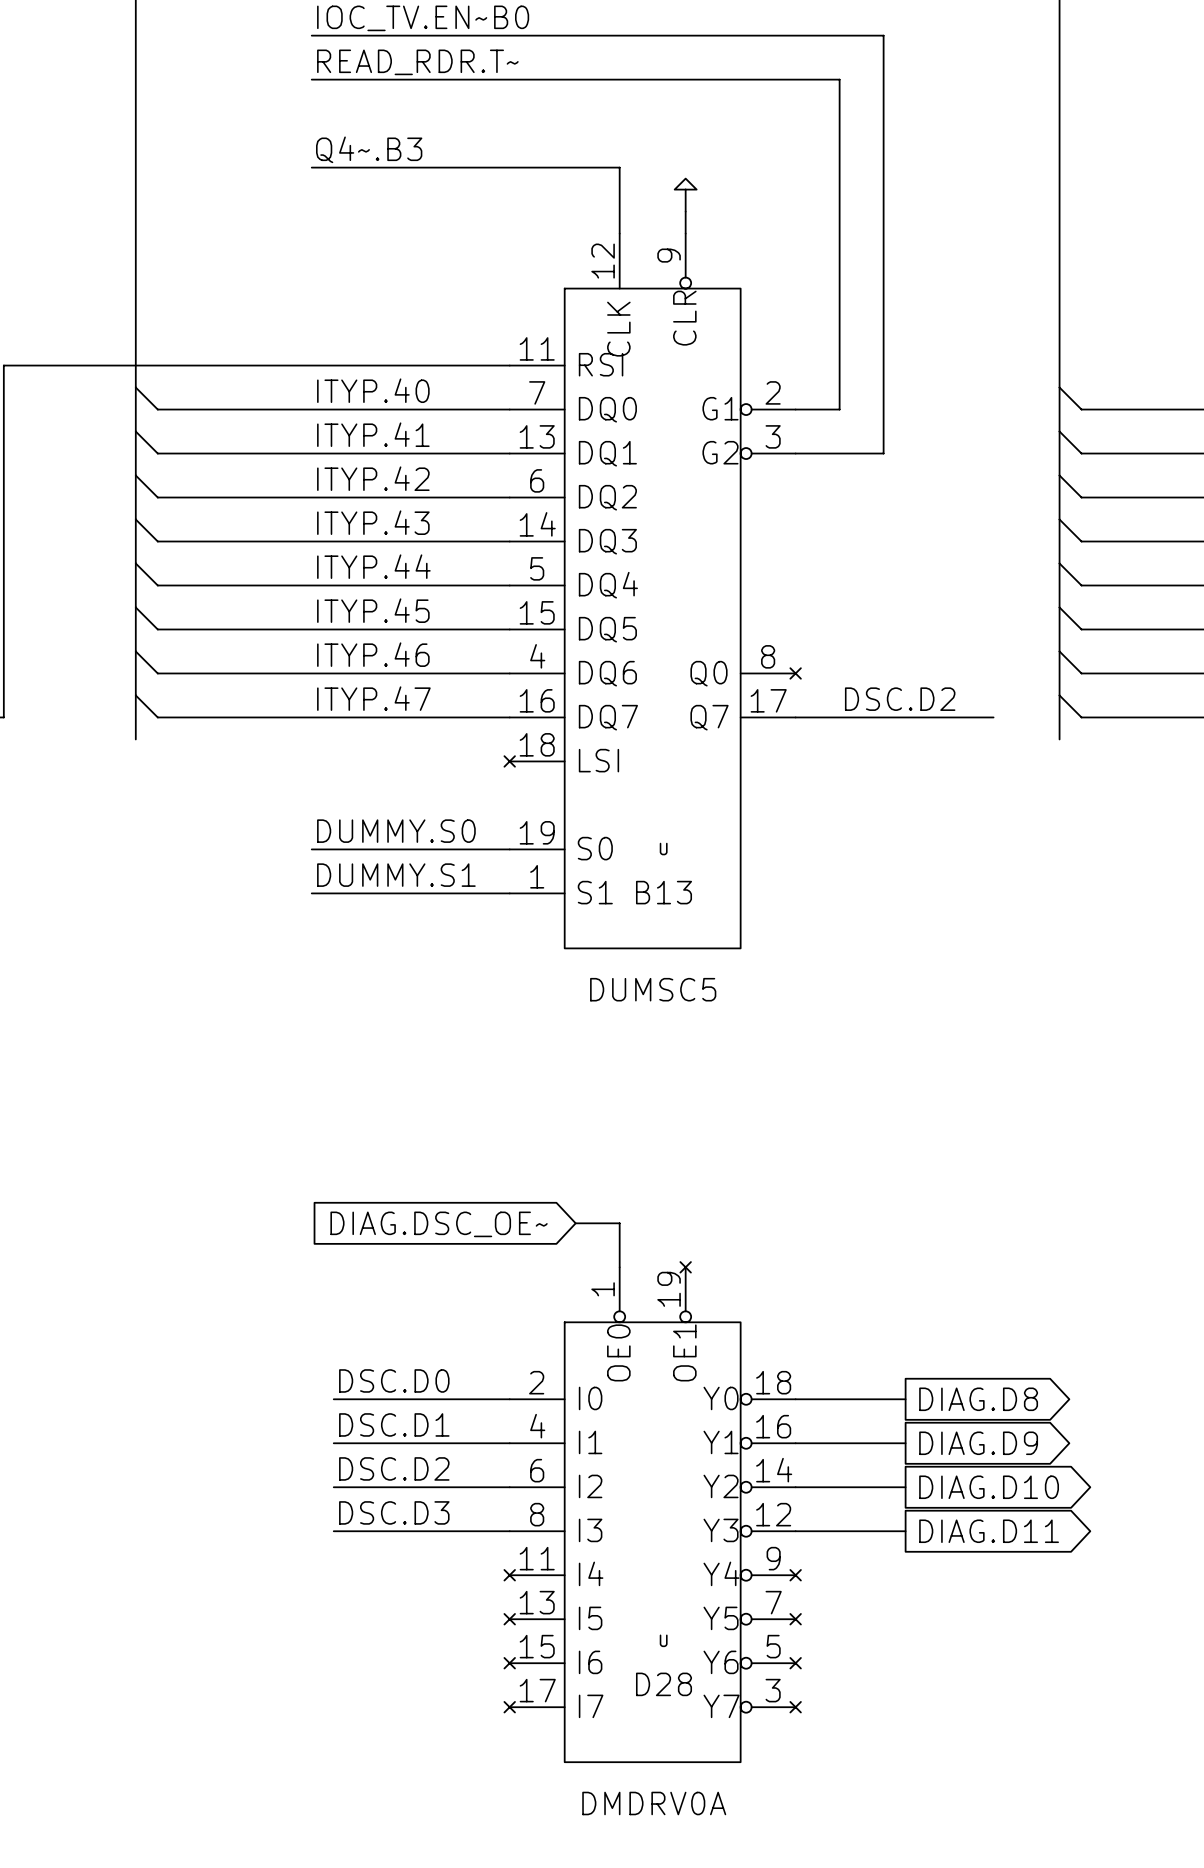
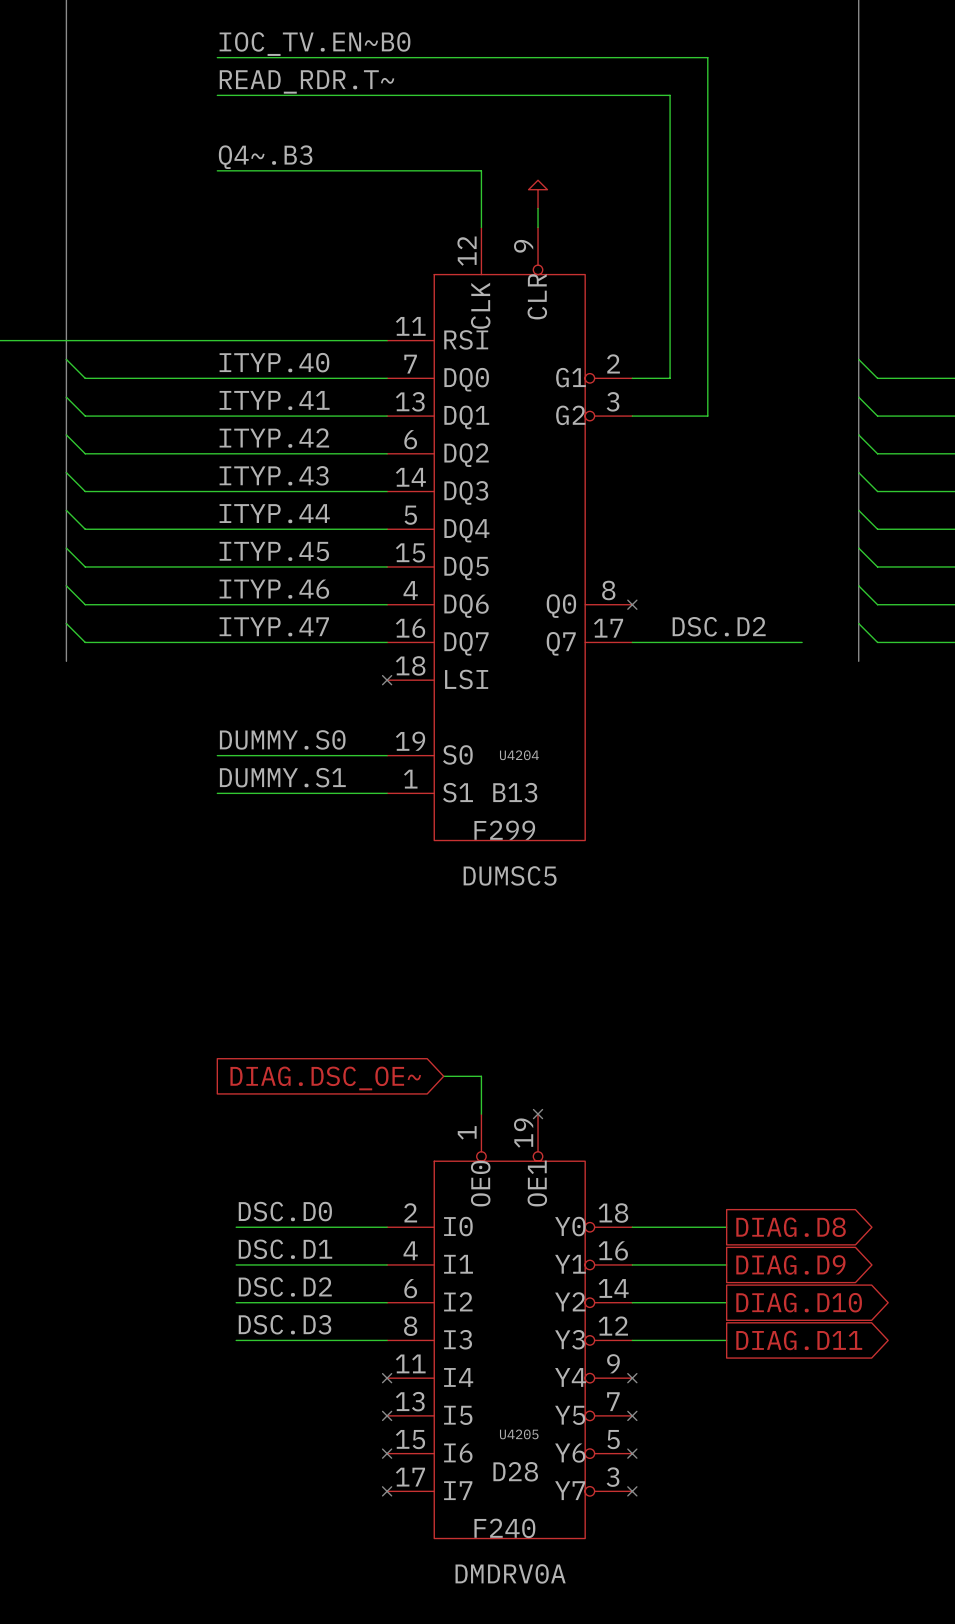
U name: U (663, 849) -> U4204 (519, 755)
U value: none -> F299 (504, 830)
U name: U (663, 1640) -> U4205 (519, 1434)
U value: none -> F240 (504, 1528)

